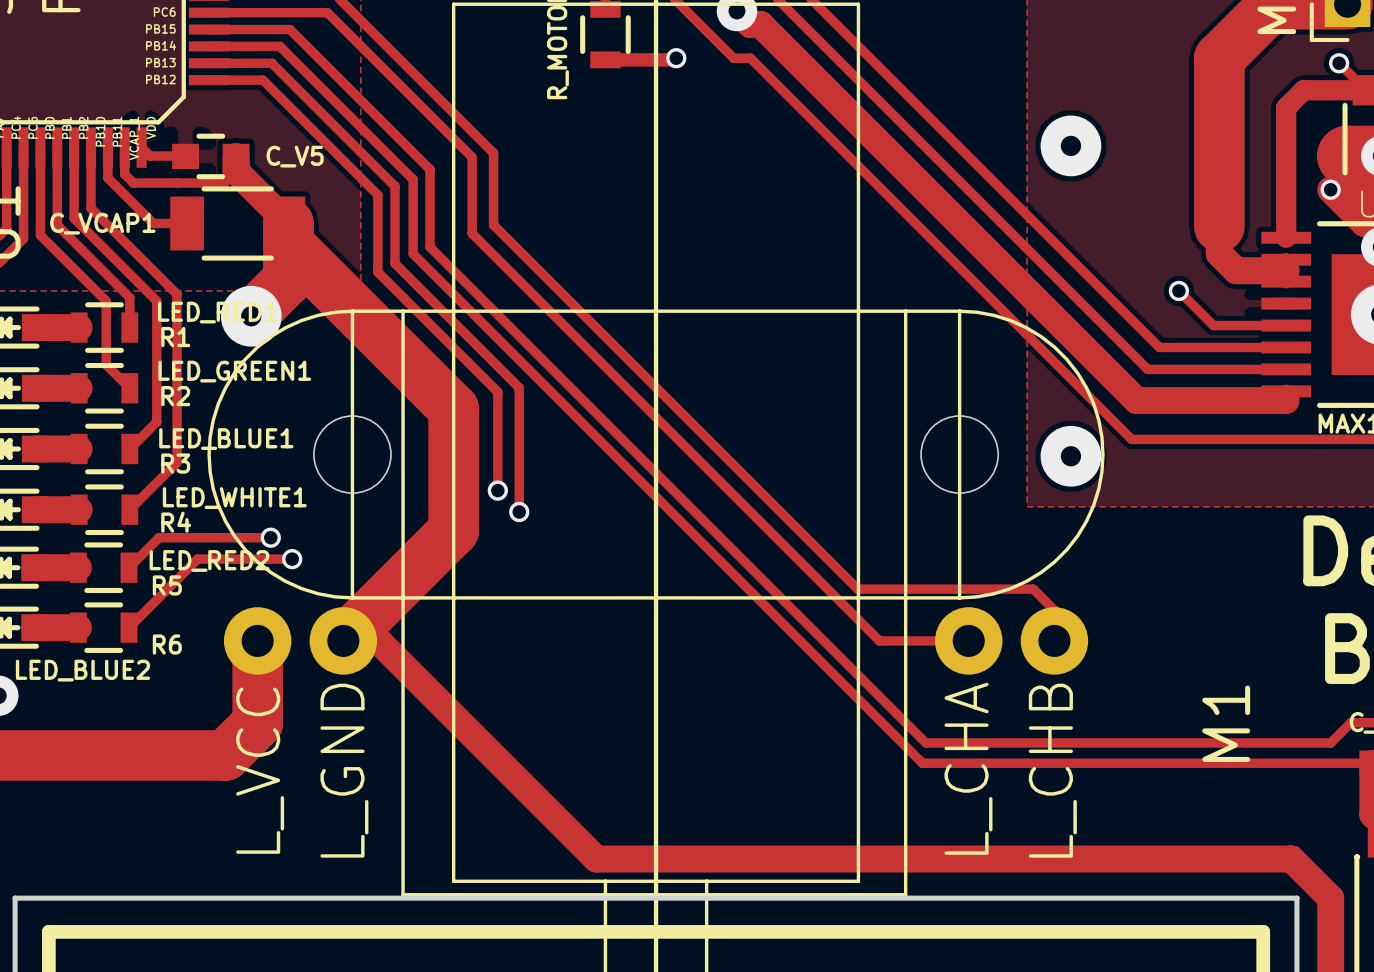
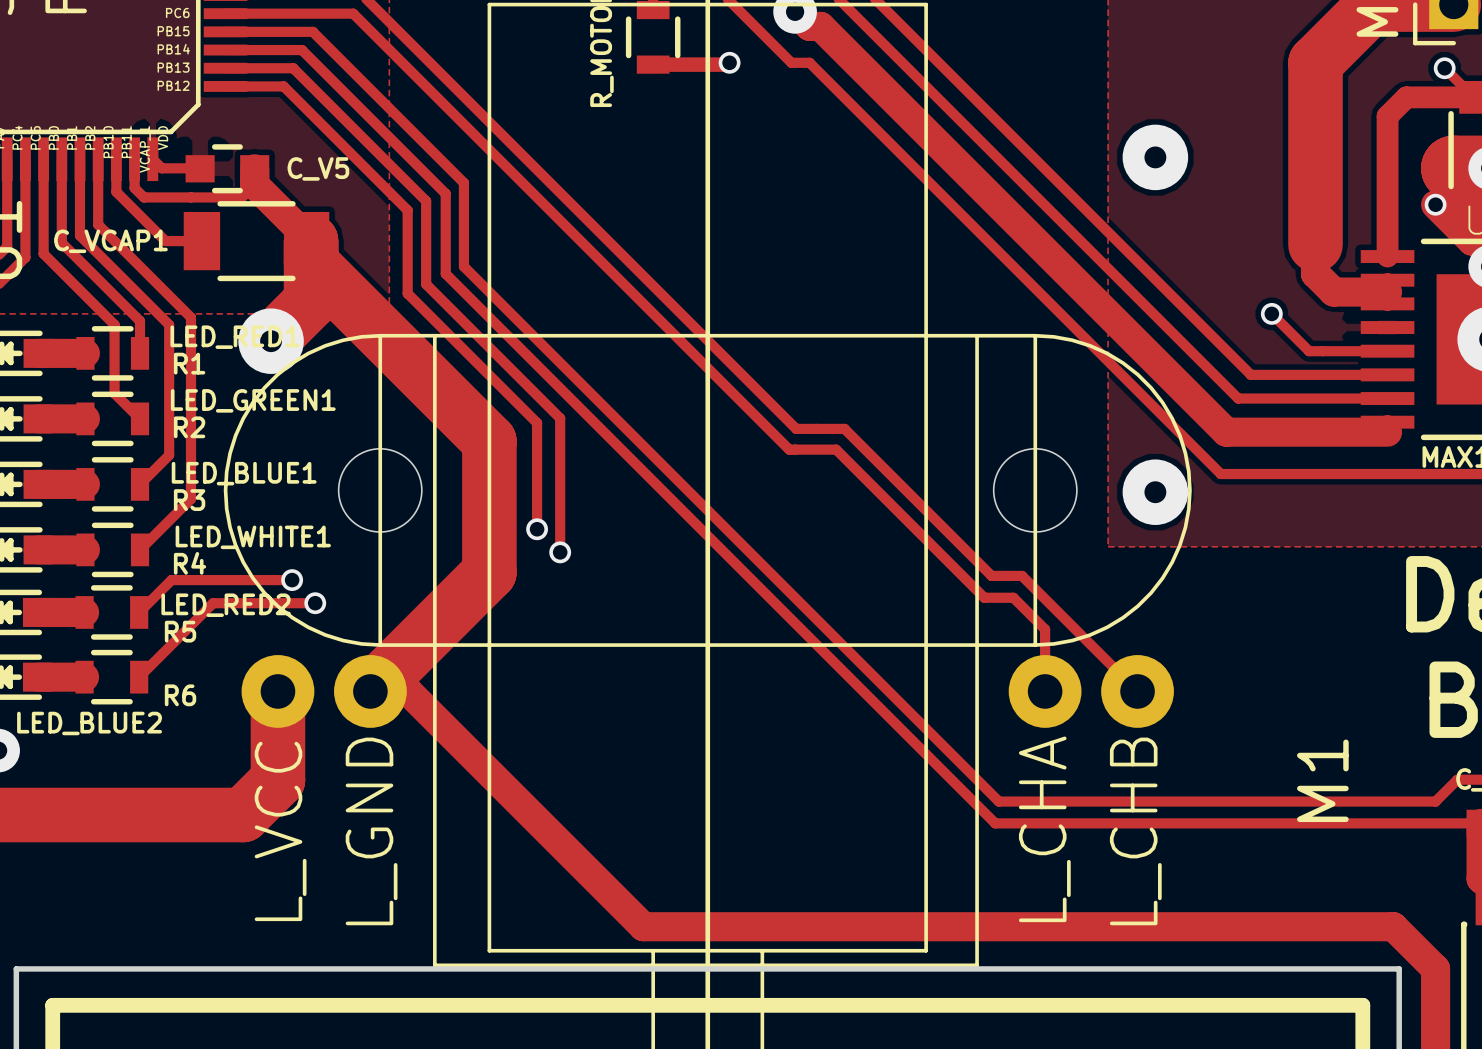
track: (493, 153) (493, 224) (857, 589) (1033, 589) (1054, 610) (1054, 640) -> (532, 165) (796, 428) (844, 428) (991, 575) (1022, 575) (1137, 691)
track: (472, 157) (472, 233) (879, 640) (968, 640) -> (509, 169) (789, 449) (836, 449) (984, 597) (1013, 597) (1045, 629) (1045, 691)

